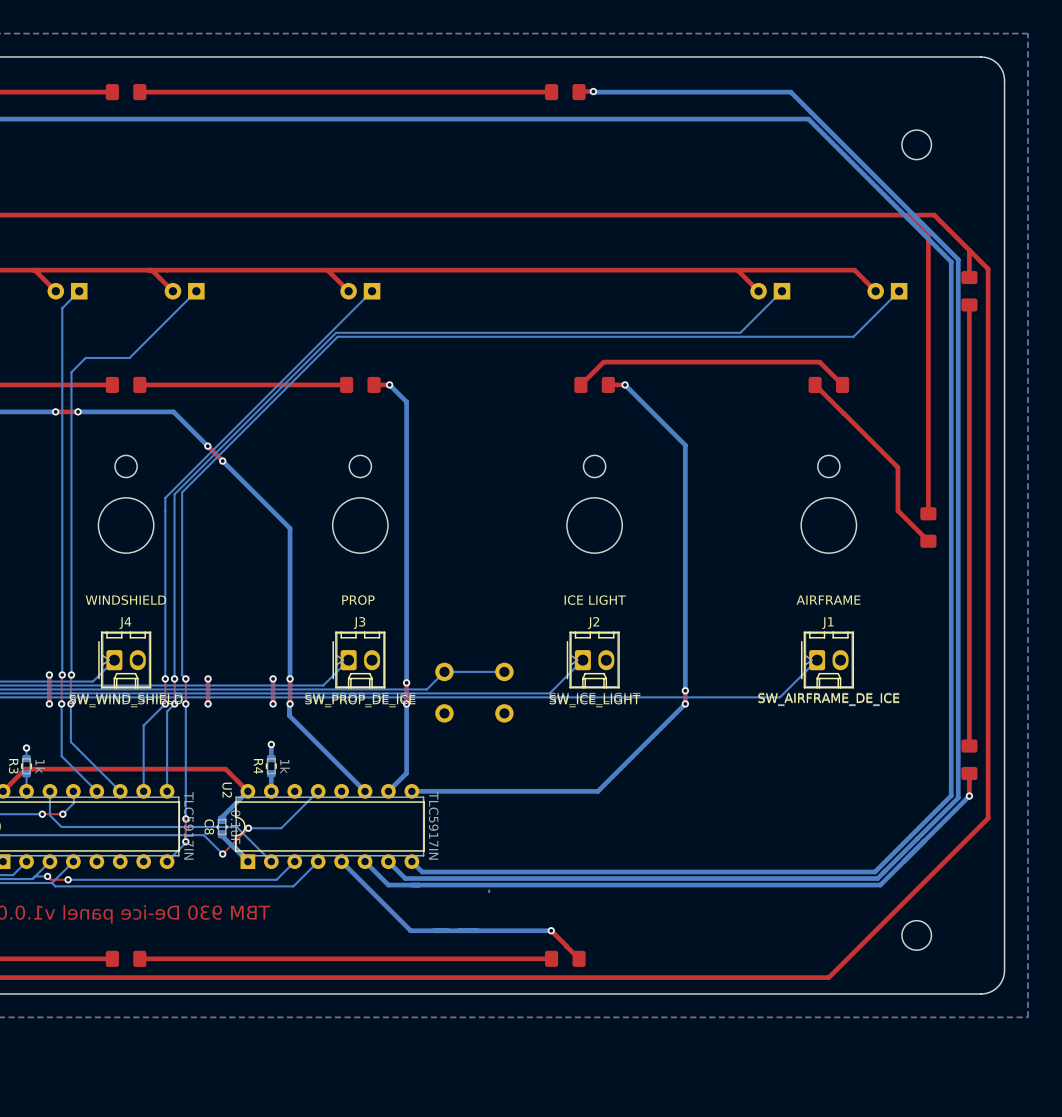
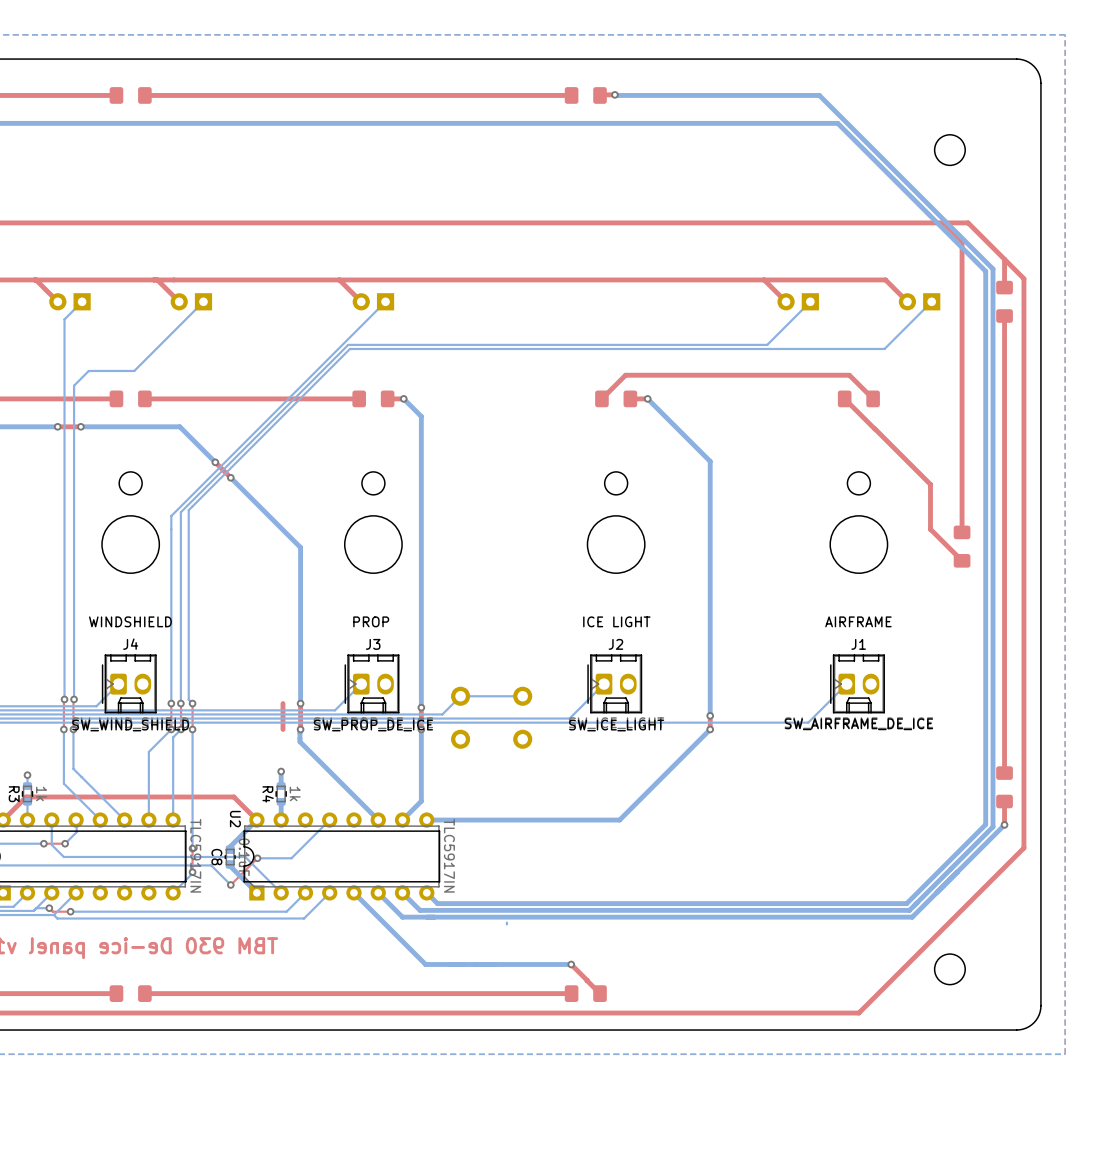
top track: (49, 674) (49, 703) -> none
via: (49, 674) -> none
top track: (208, 678) (208, 703) -> none
via: (208, 678) -> none
via: (273, 678) -> none
via: (49, 703) -> none
via: (208, 703) -> none
via: (273, 703) -> none

